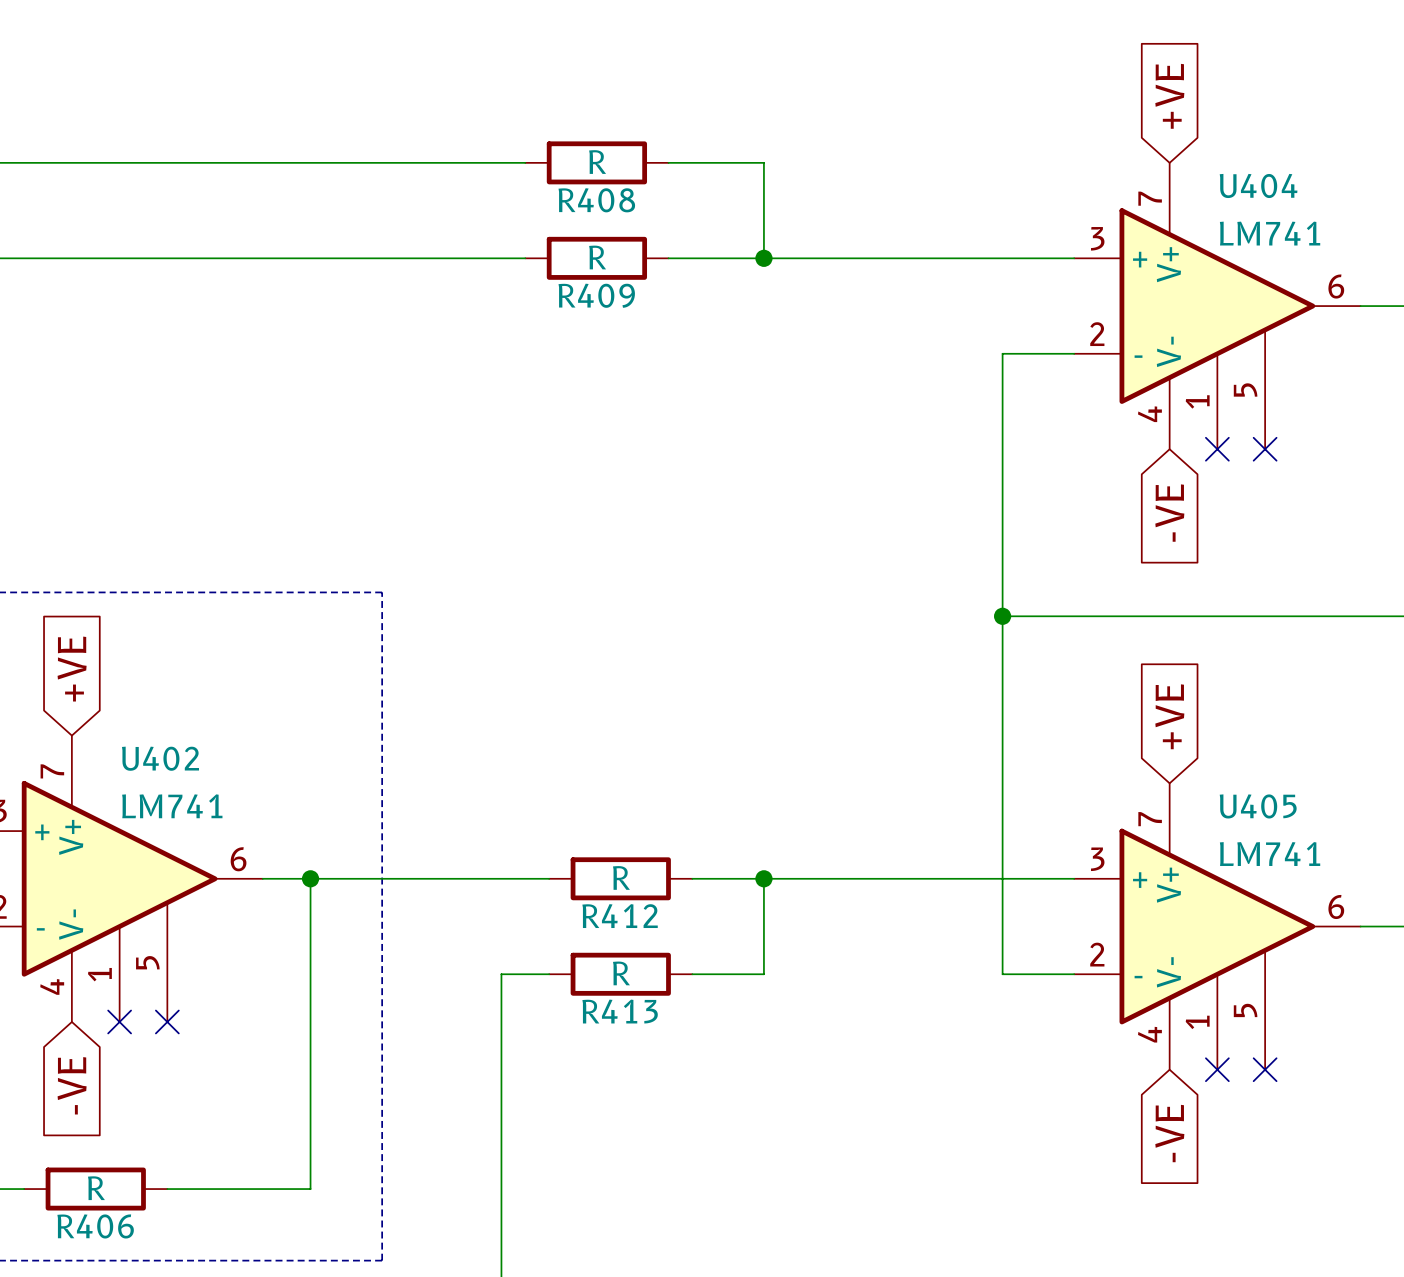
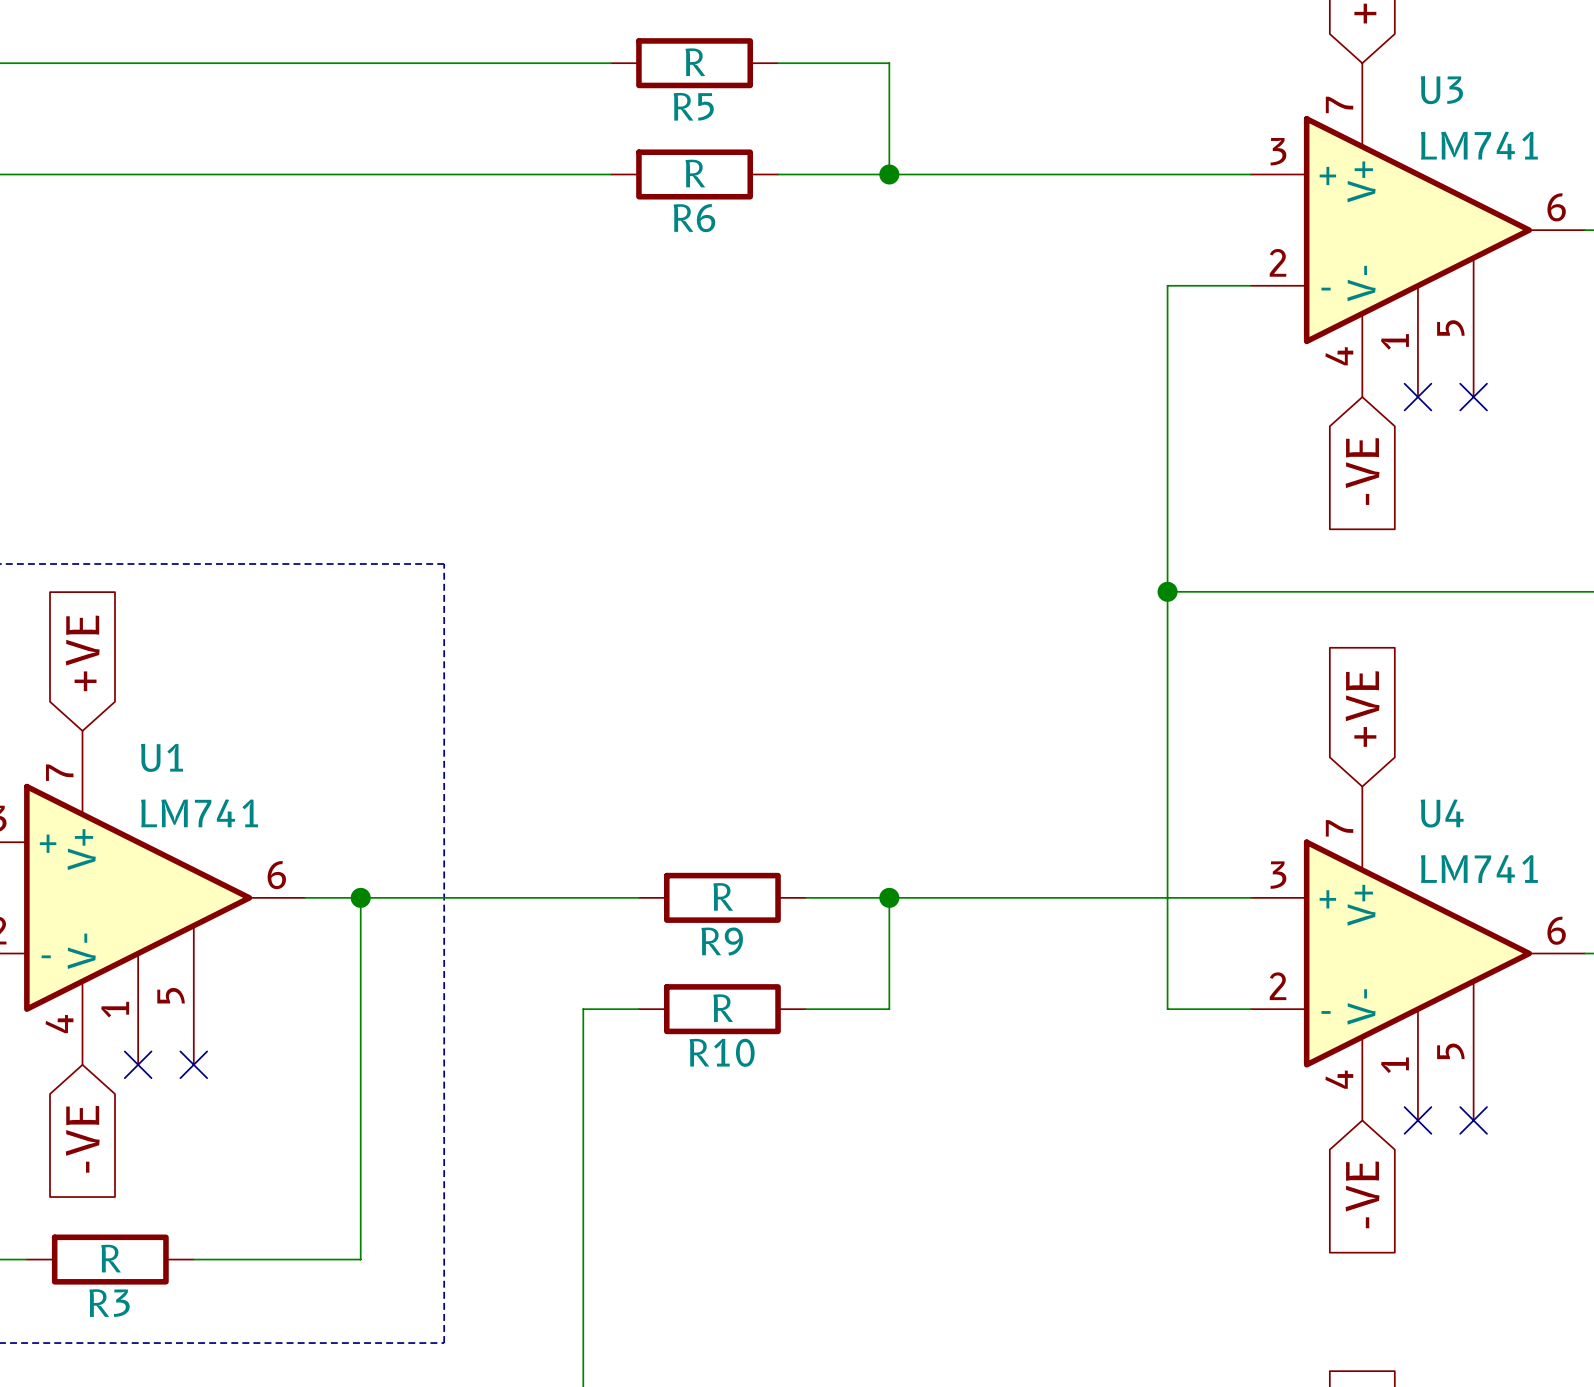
U404 name: U404 (1258, 185) -> U3 (1441, 90)
R408 name: R408 (596, 200) -> R5 (693, 106)
R409 name: R409 (596, 295) -> R6 (694, 218)
U402 name: U402 (160, 758) -> U1 (161, 757)
U405 name: U405 (1258, 806) -> U4 (1442, 813)
R412 name: R412 (620, 916) -> R9 (722, 941)
R413 name: R413 (620, 1011) -> R10 (722, 1052)
R406 name: R406 (95, 1226) -> R3 (109, 1303)

